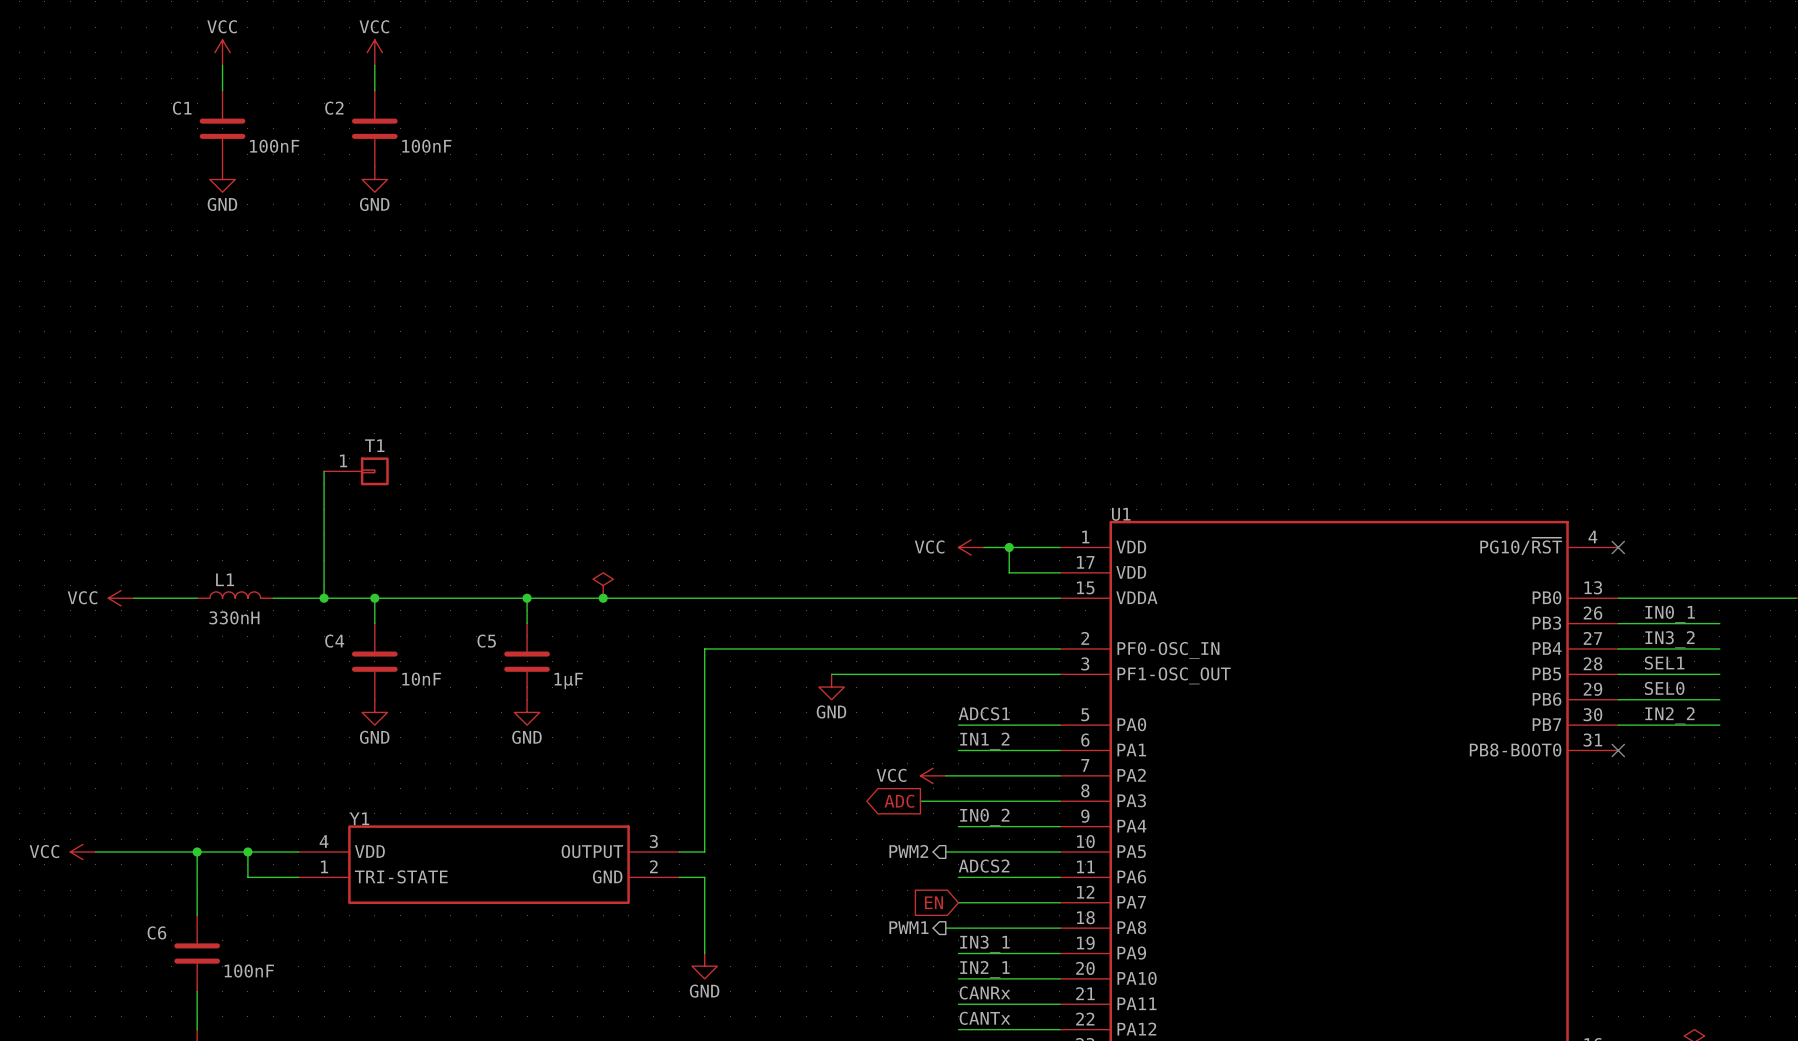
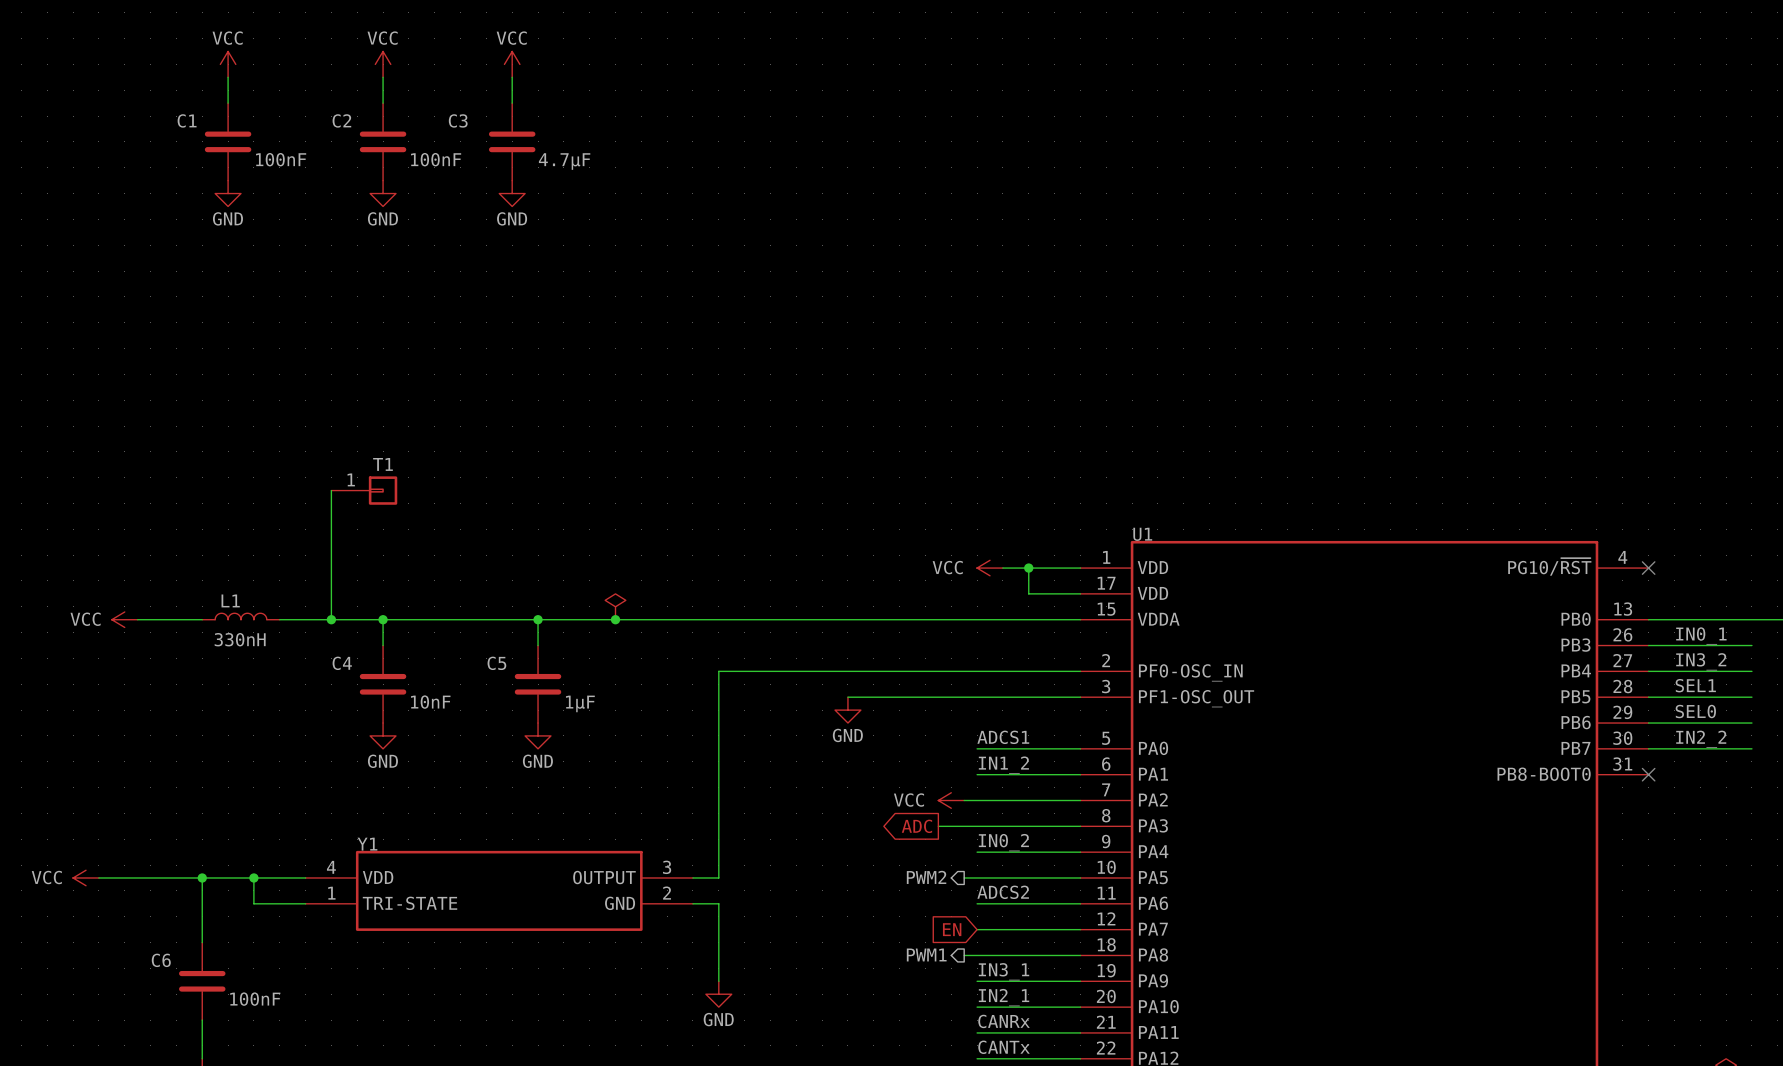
power symbol: none -> VCC (512, 64)
wire: none -> (512, 77) (512, 103)
C3: none -> (512, 141)
power symbol: none -> GND (512, 193)

